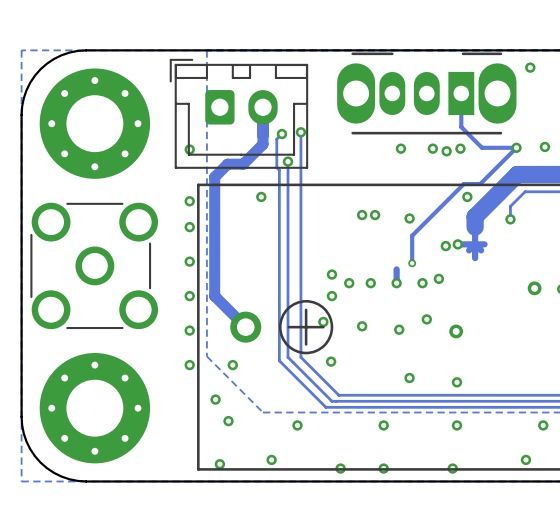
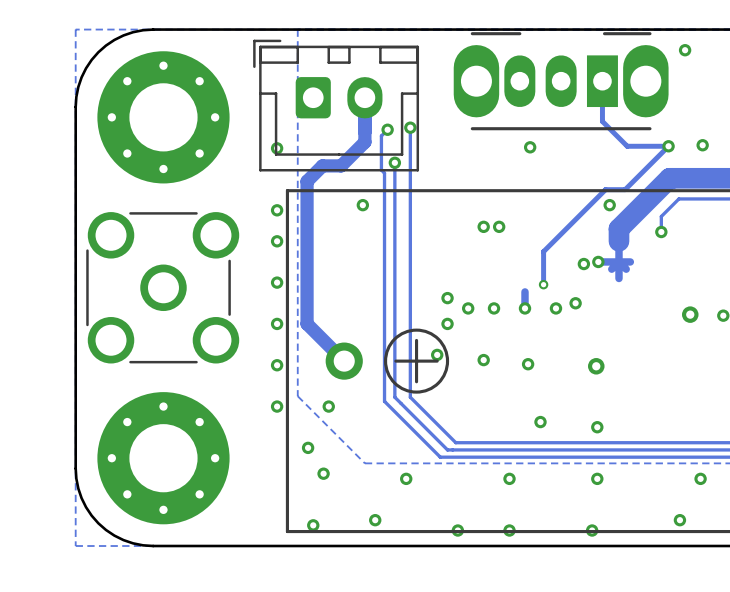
via: (432, 148) -> none
via: (460, 148) -> none
via: (446, 151) -> none
via: (409, 218) -> none
via: (426, 319) -> none
via: (331, 361) -> none

